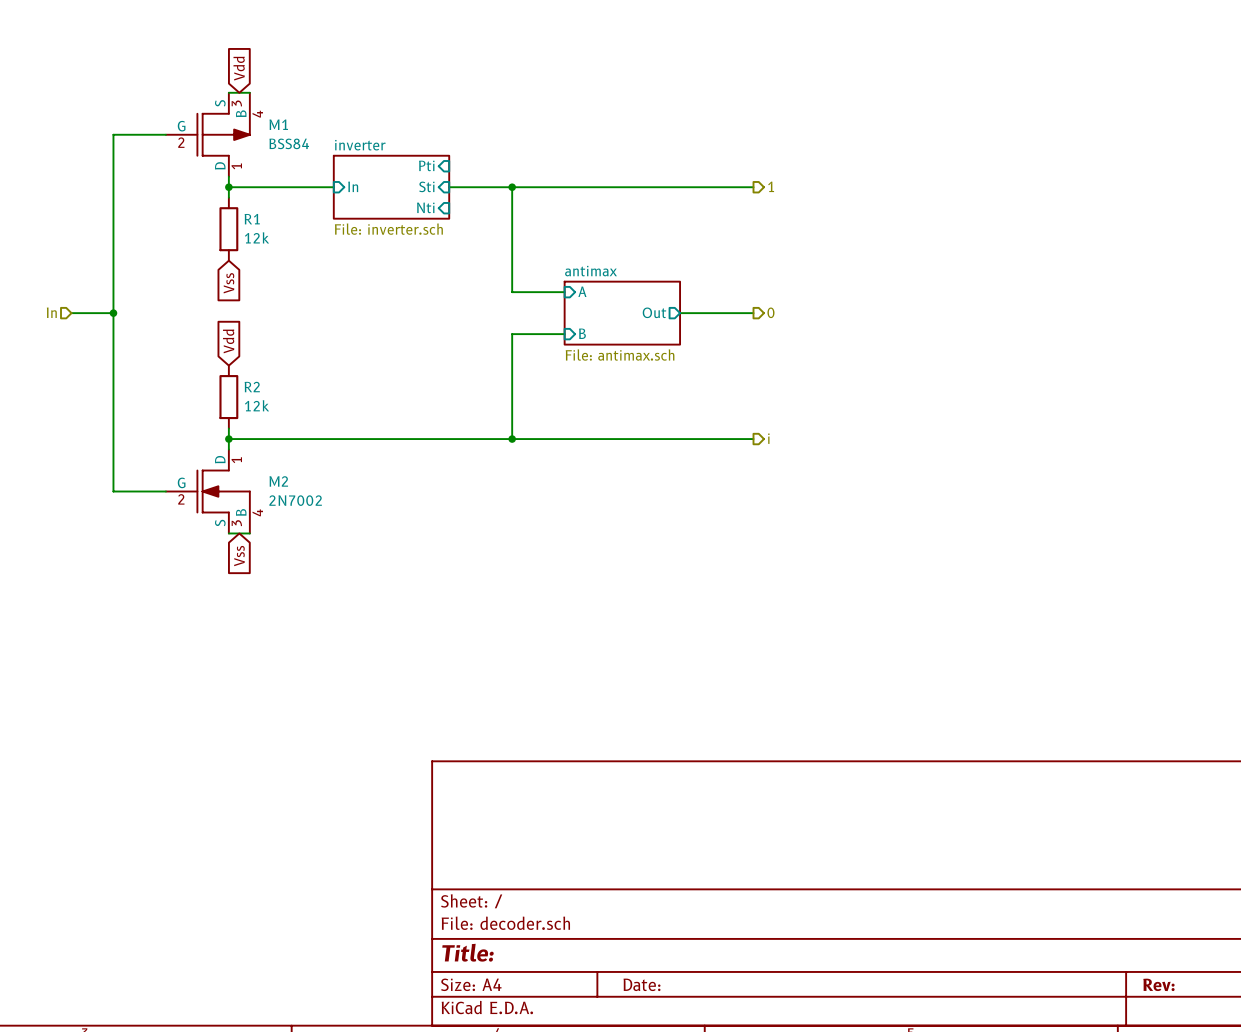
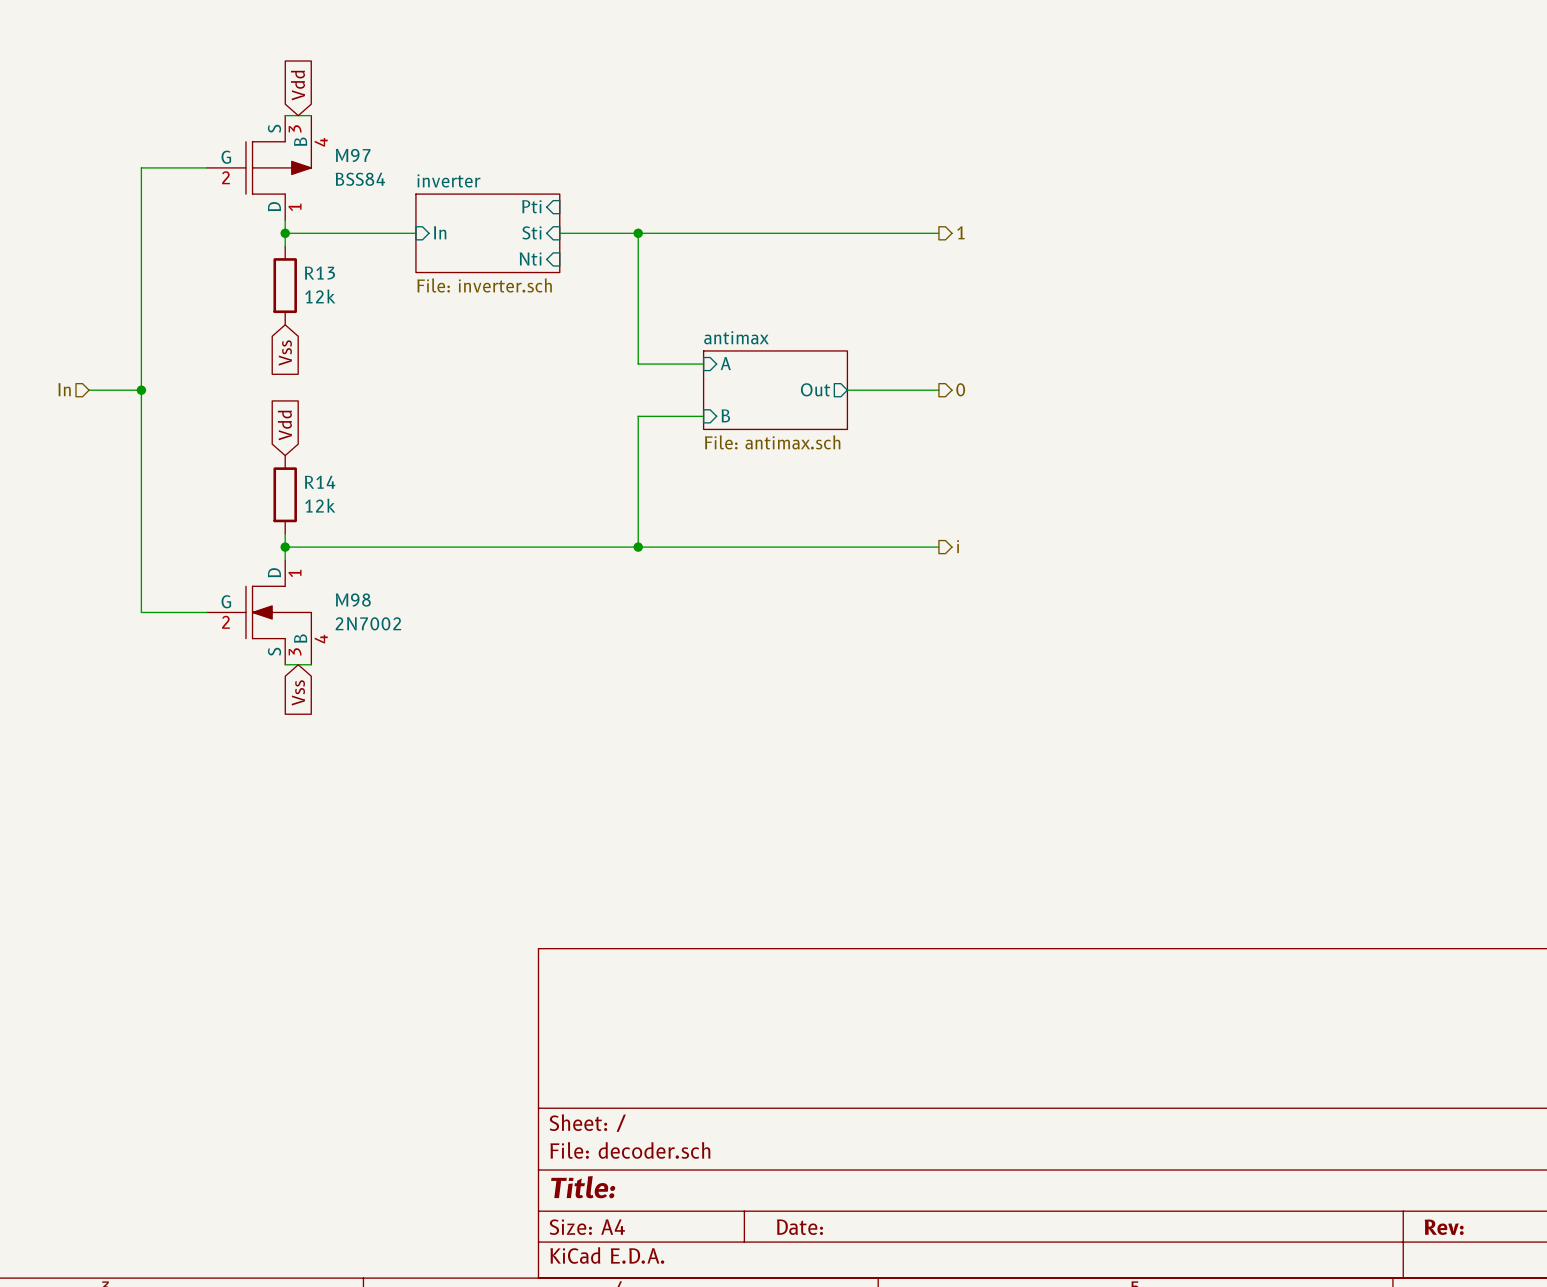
M1 name: M1 (278, 124) -> M97 (353, 155)
R1 name: R1 (252, 219) -> R13 (319, 273)
R2 name: R2 (252, 387) -> R14 (320, 482)
M2 name: M2 (278, 481) -> M98 (353, 600)

